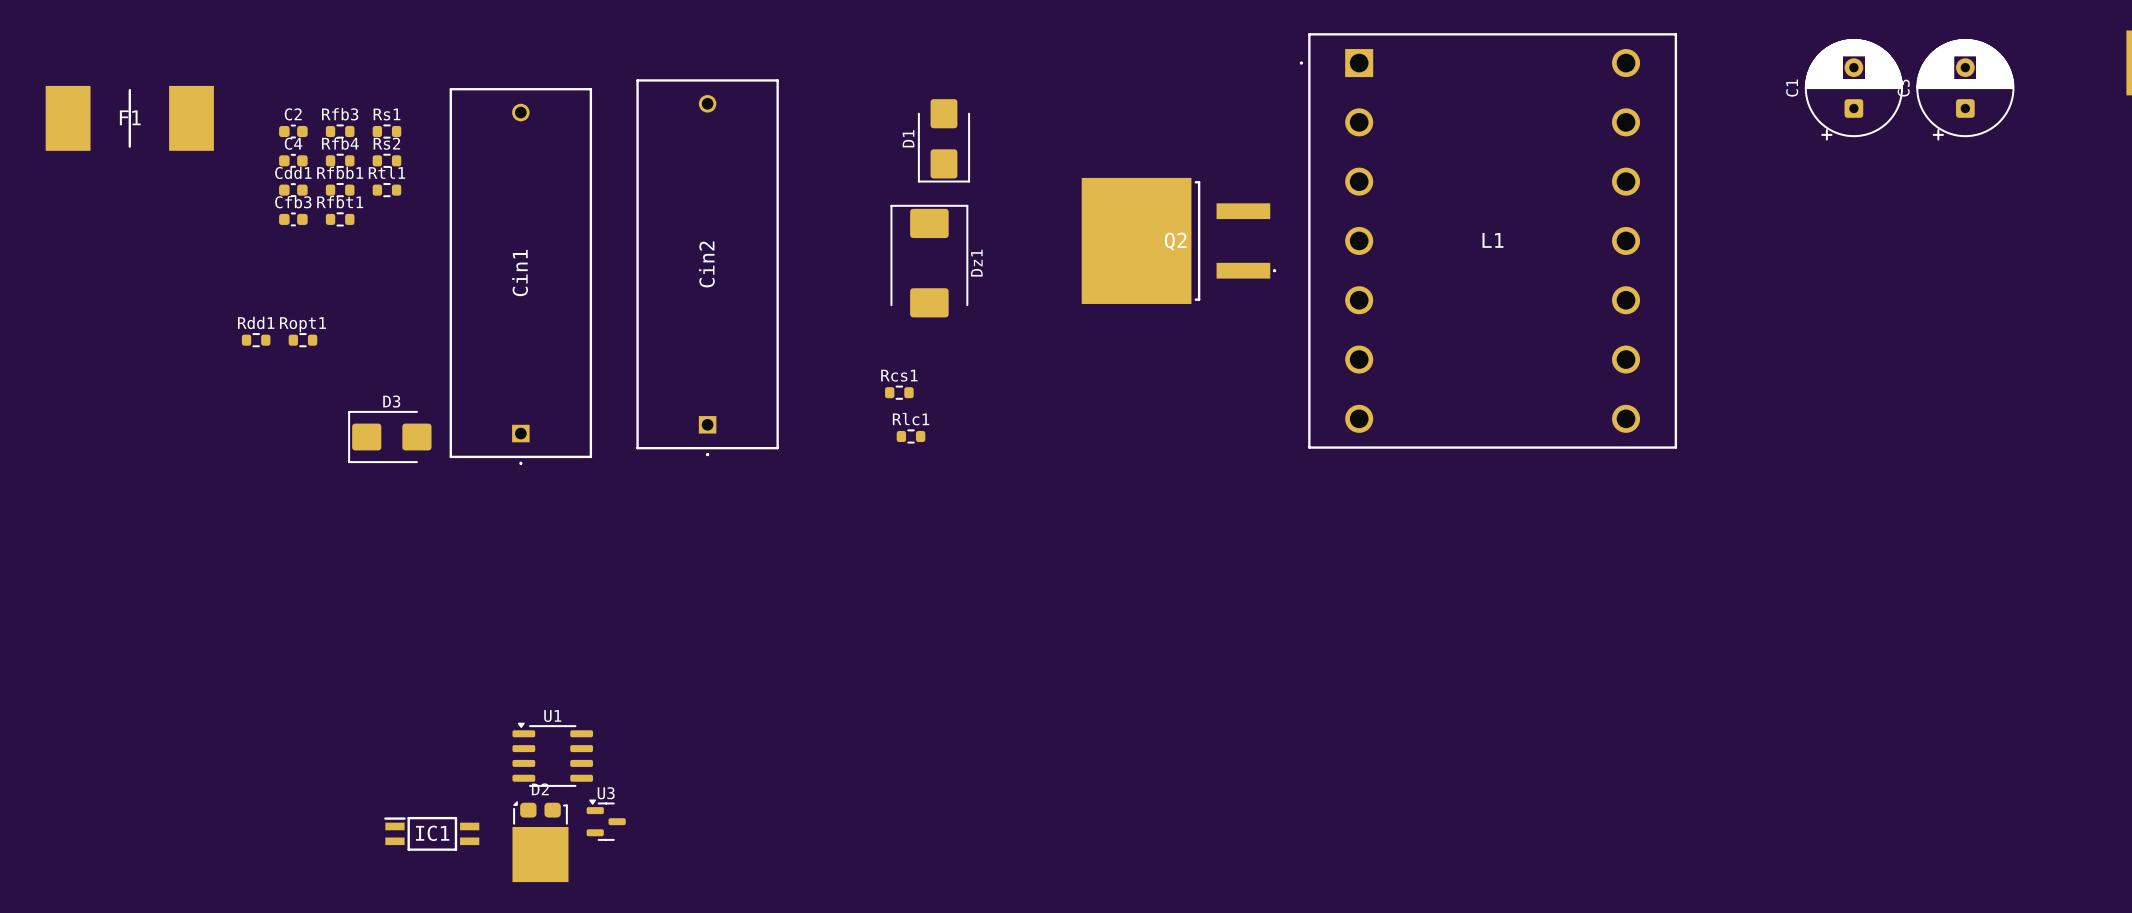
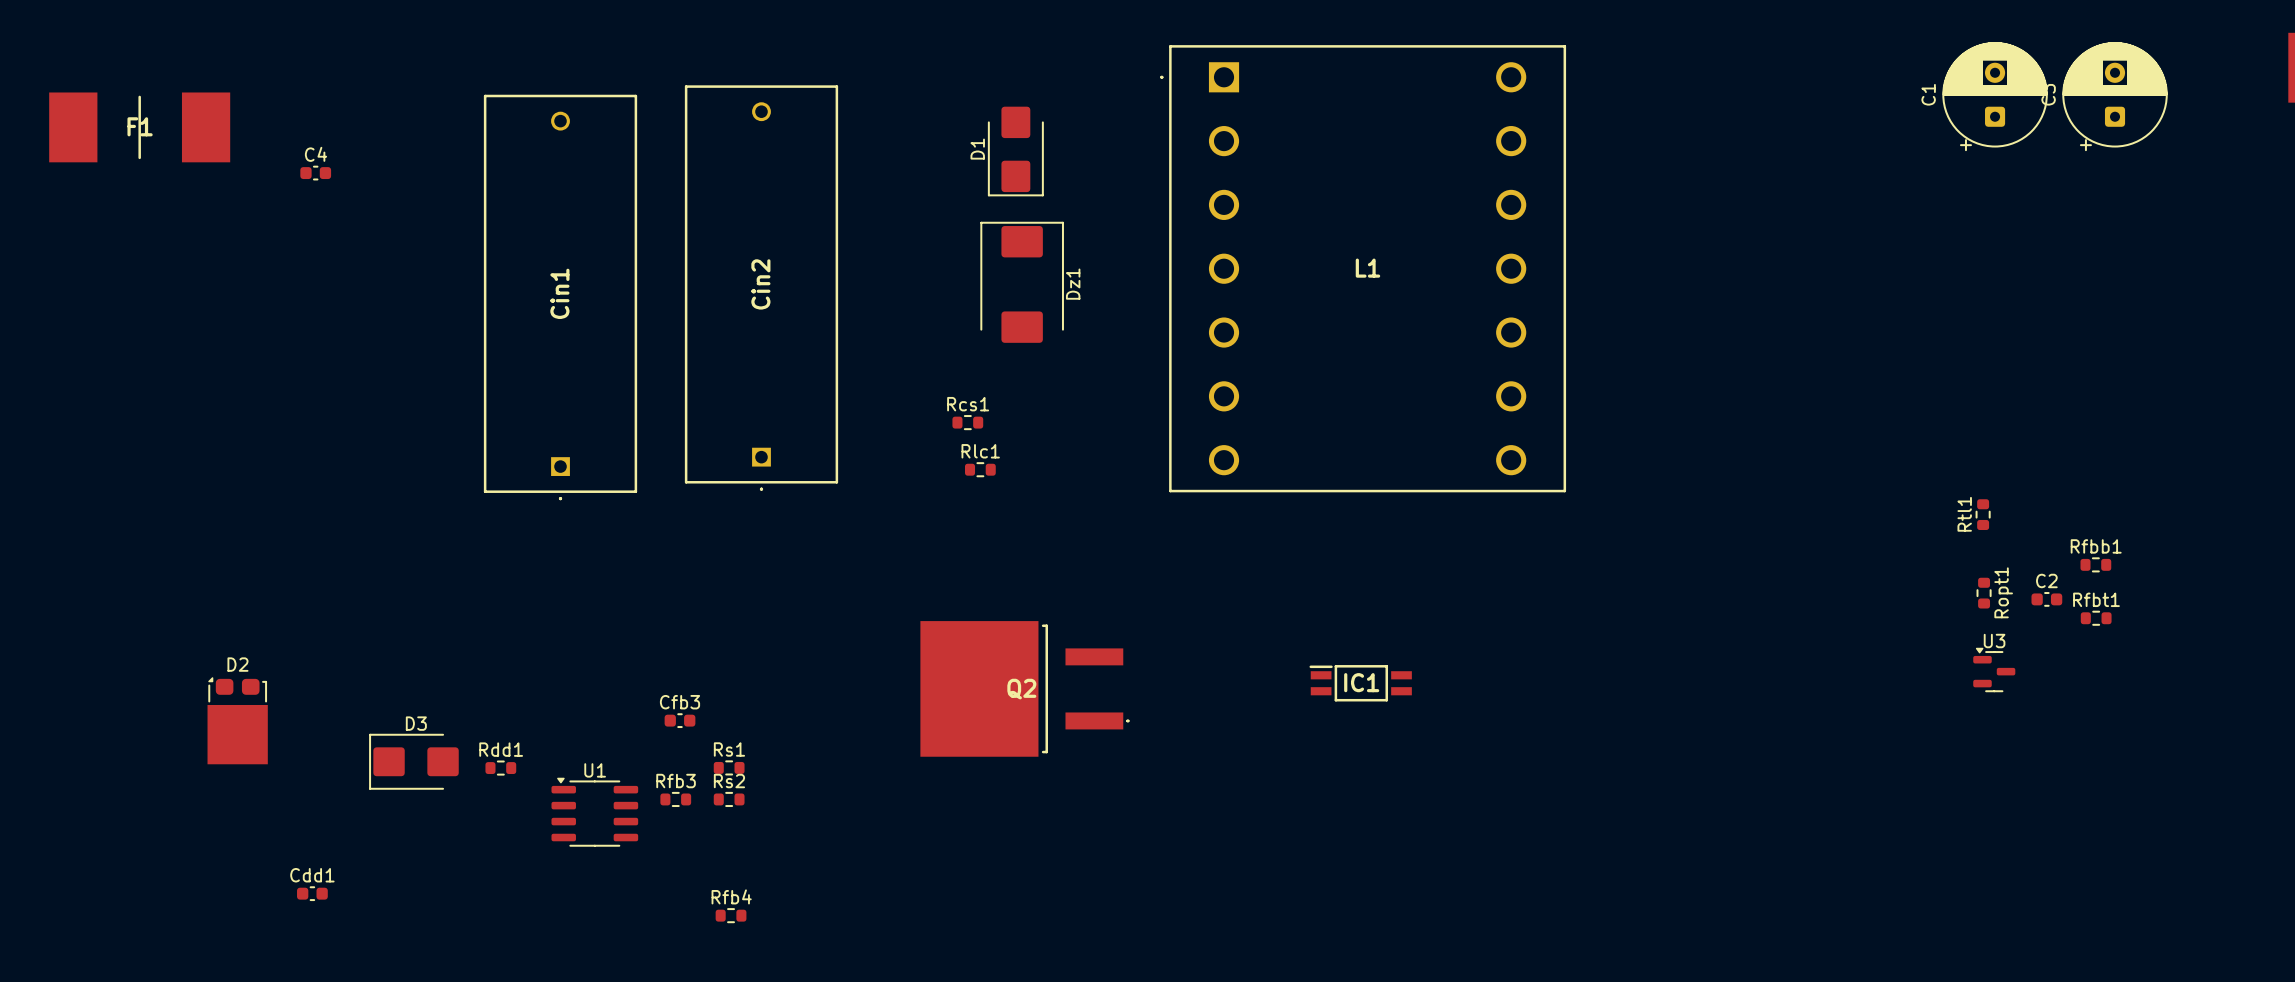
C2 position: (293, 131) -> (2046, 599)
Rfb3 position: (340, 131) -> (675, 799)
Rs1 position: (386, 131) -> (729, 767)
Rfb4 position: (340, 160) -> (731, 915)
Rs2 position: (386, 160) -> (729, 799)
Rtl1 name position: Rtl1 (387, 172) -> Rtl1 (1964, 514)
Cdd1 position: (293, 190) -> (312, 893)
Rfbb1 position: (340, 190) -> (2095, 564)
Rtl1 rotation: 0° (386, 190) -> 90° clockwise (1983, 514)
Rtl1 position: (386, 190) -> (1983, 514)
Cfb3 position: (293, 219) -> (680, 720)
Rfbt1 position: (340, 219) -> (2096, 618)
Q2 position: (1178, 240) -> (1024, 688)
L1 position: (1488, 240) -> (1363, 268)
Dz1 position: (929, 261) -> (1022, 282)
Rdd1 position: (256, 340) -> (500, 768)
Ropt1 rotation: 0° (302, 340) -> 90° clockwise (1984, 593)
Ropt1 position: (302, 340) -> (1984, 593)
D3 position: (389, 437) -> (414, 761)
U3 position: (606, 820) -> (1994, 669)
IC1 position: (431, 833) -> (1360, 683)
D2 position: (540, 841) -> (237, 720)

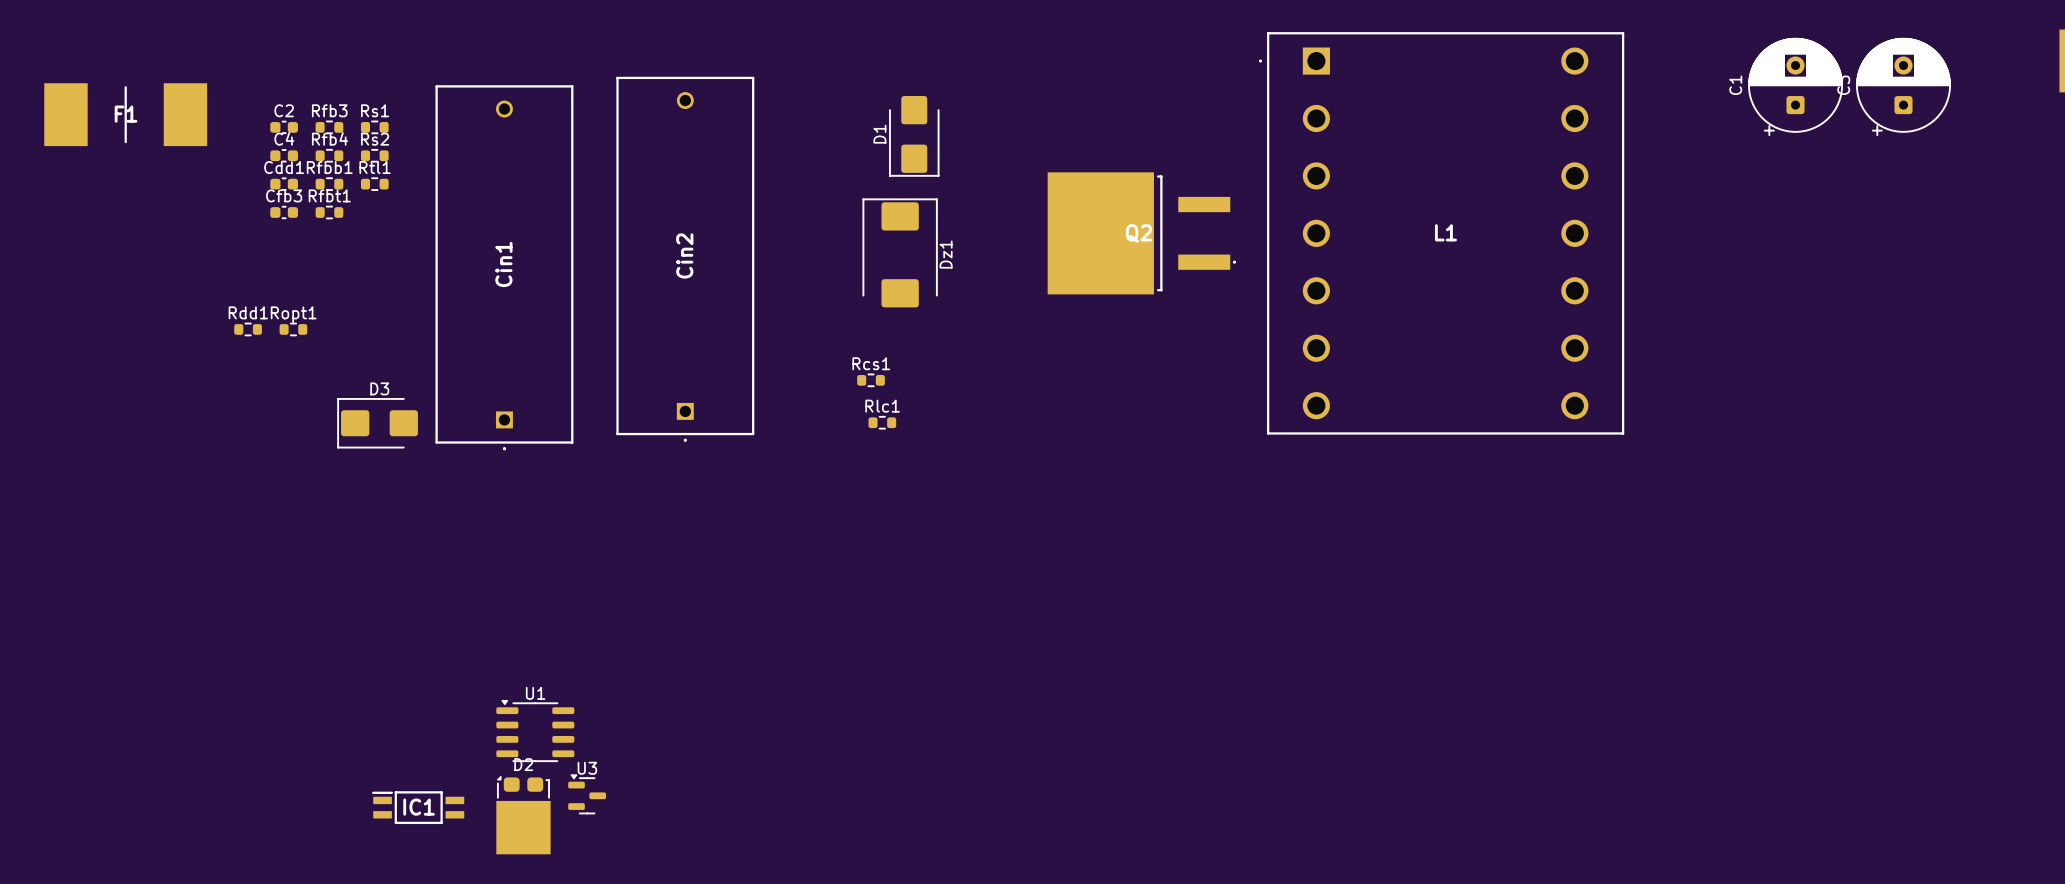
L1 position: (1363, 268) -> (1441, 233)
Dz1 position: (1022, 282) -> (900, 253)
Rtl1 rotation: 0° (1983, 514) -> 90° clockwise (374, 184)
Rtl1 position: (1983, 514) -> (374, 184)
Rfbb1 position: (2095, 564) -> (329, 184)
Ropt1 name position: Ropt1 (2003, 592) -> Ropt1 (293, 314)
Ropt1 rotation: 0° (1984, 593) -> 90° clockwise (293, 329)
Ropt1 position: (1984, 593) -> (293, 329)
C2 position: (2046, 599) -> (284, 127)
Rfbt1 position: (2096, 618) -> (329, 212)
U3 position: (1994, 669) -> (587, 794)
IC1 position: (1360, 683) -> (418, 807)
Q2 position: (1024, 688) -> (1141, 233)
D2 position: (237, 720) -> (523, 815)
Cfb3 position: (680, 720) -> (284, 212)
D3 position: (414, 761) -> (377, 423)
Rs1 position: (729, 767) -> (374, 127)
Rdd1 position: (500, 768) -> (248, 329)
Rfb3 position: (675, 799) -> (329, 127)
Rs2 position: (729, 799) -> (374, 155)
Cdd1 position: (312, 893) -> (284, 184)
Rfb4 position: (731, 915) -> (329, 155)

